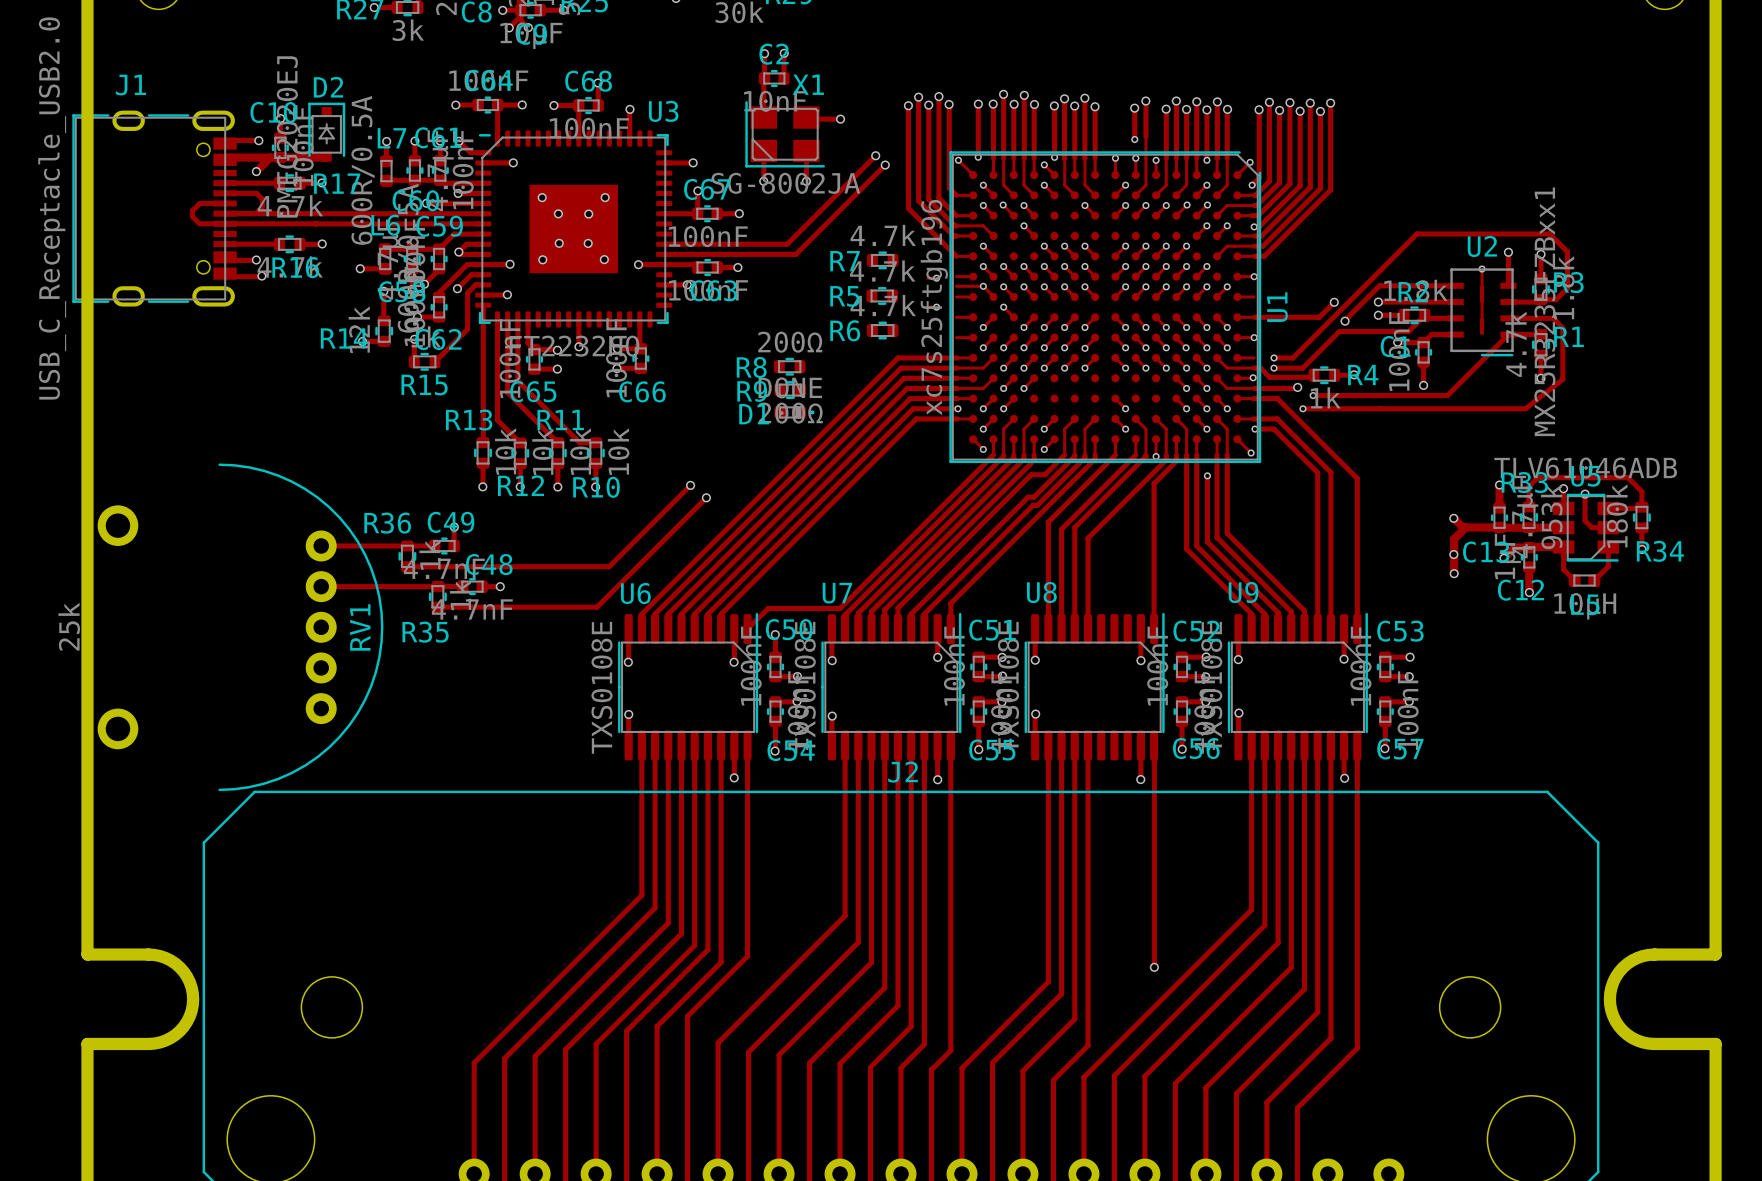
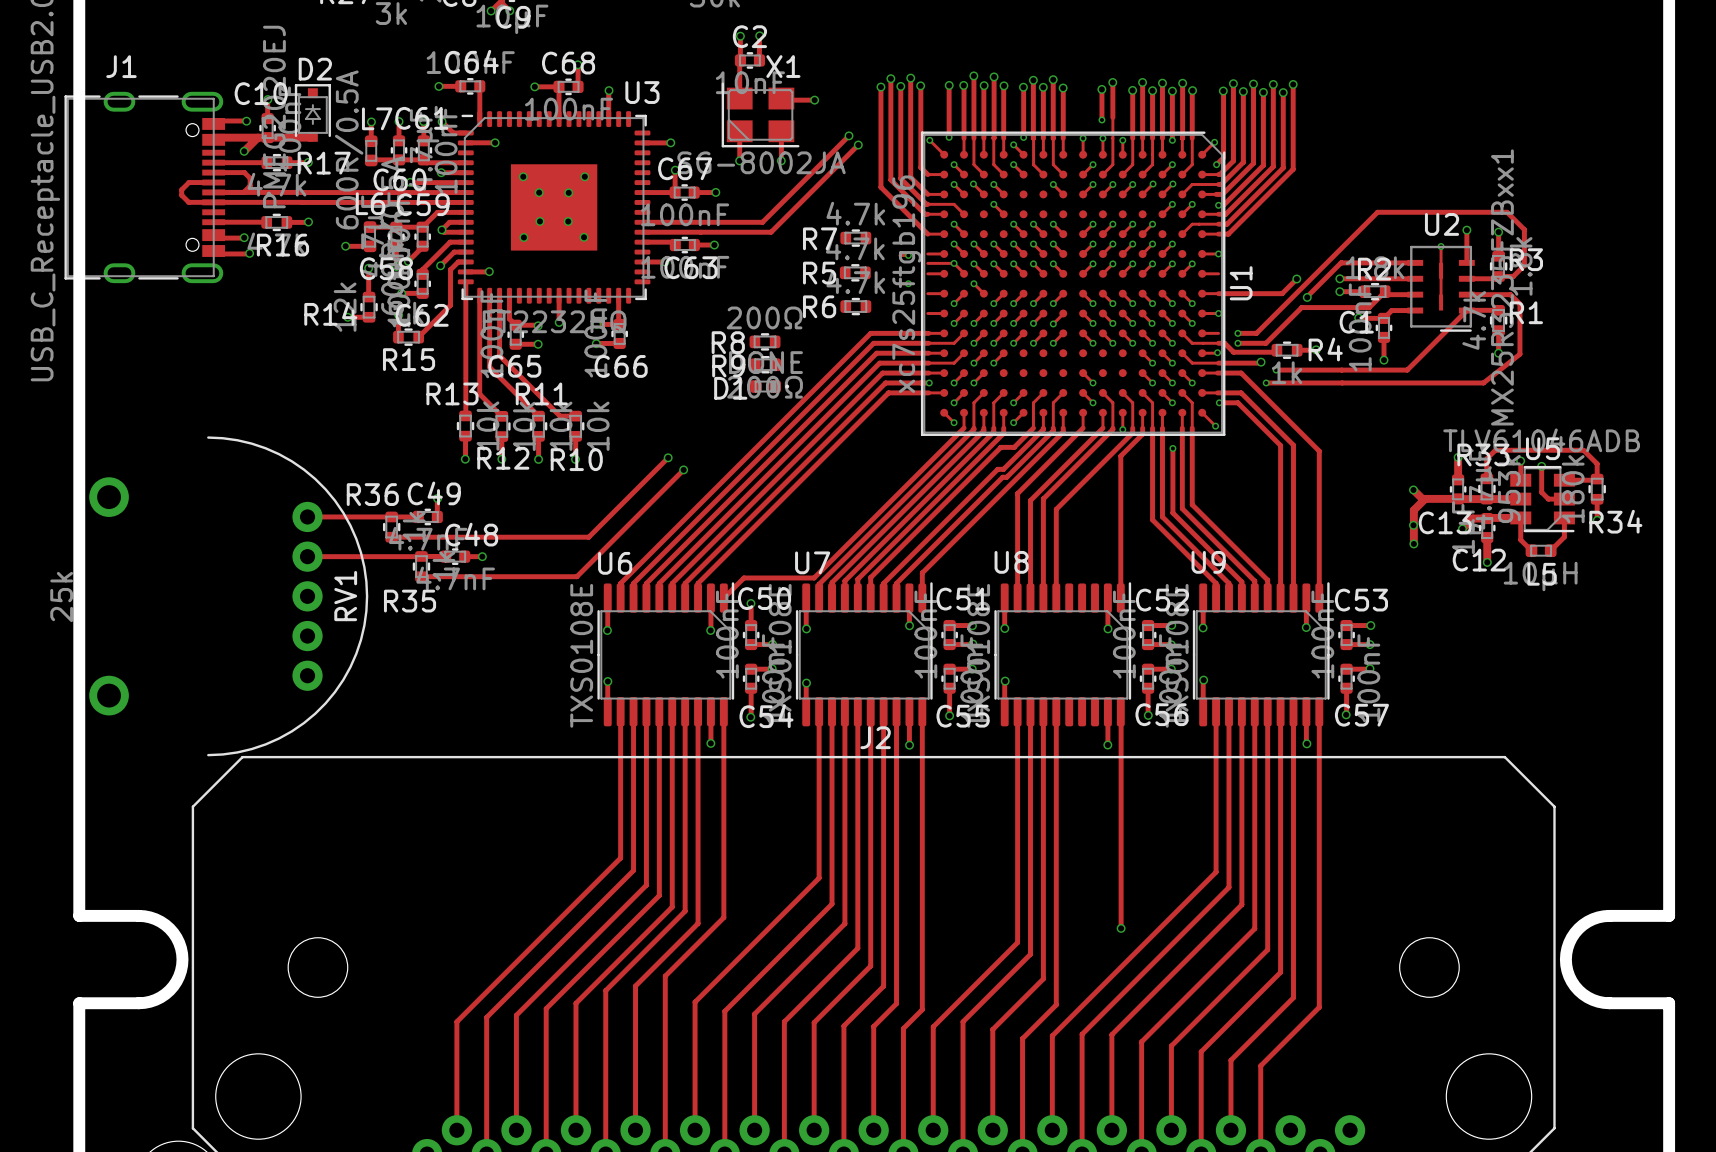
via: (522, 104) -> none
track: (497, 105) (522, 105) -> none
track: (510, 264) (483, 264) -> none
via: (510, 264) -> none
track: (638, 264) (664, 264) -> none
via: (638, 264) -> none

